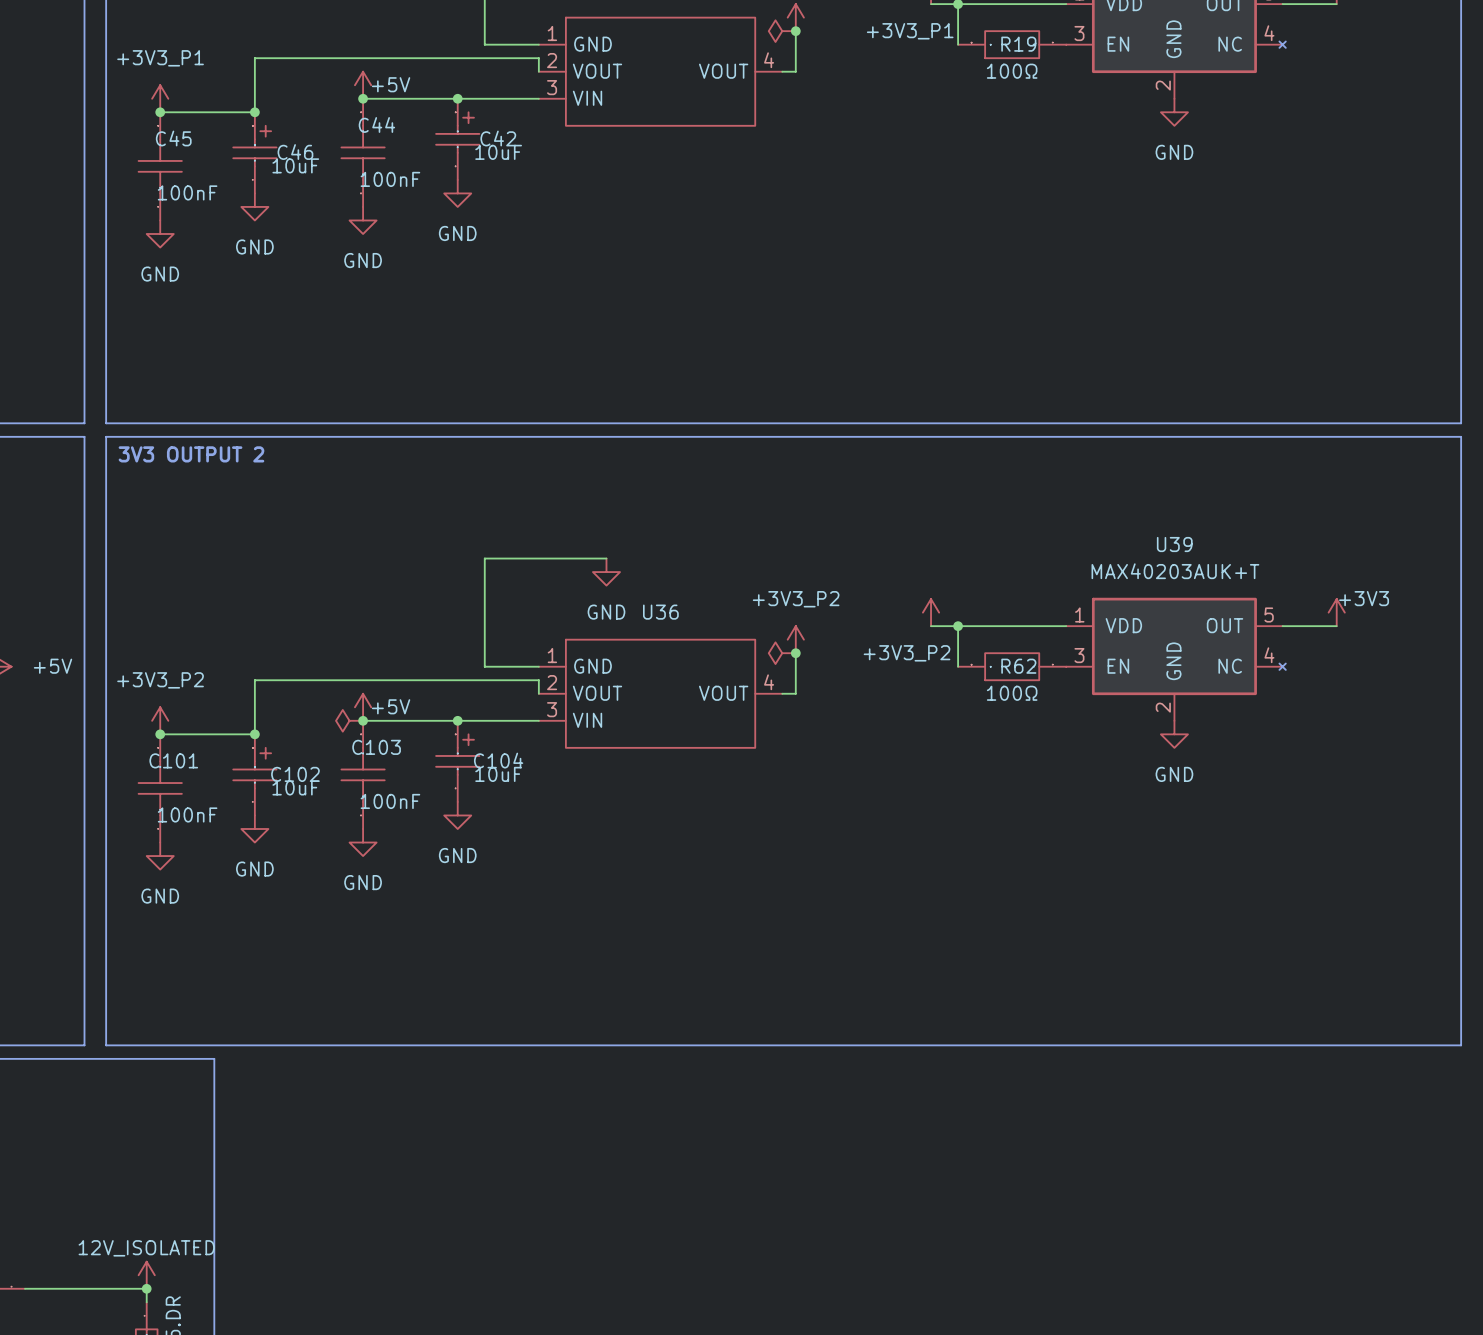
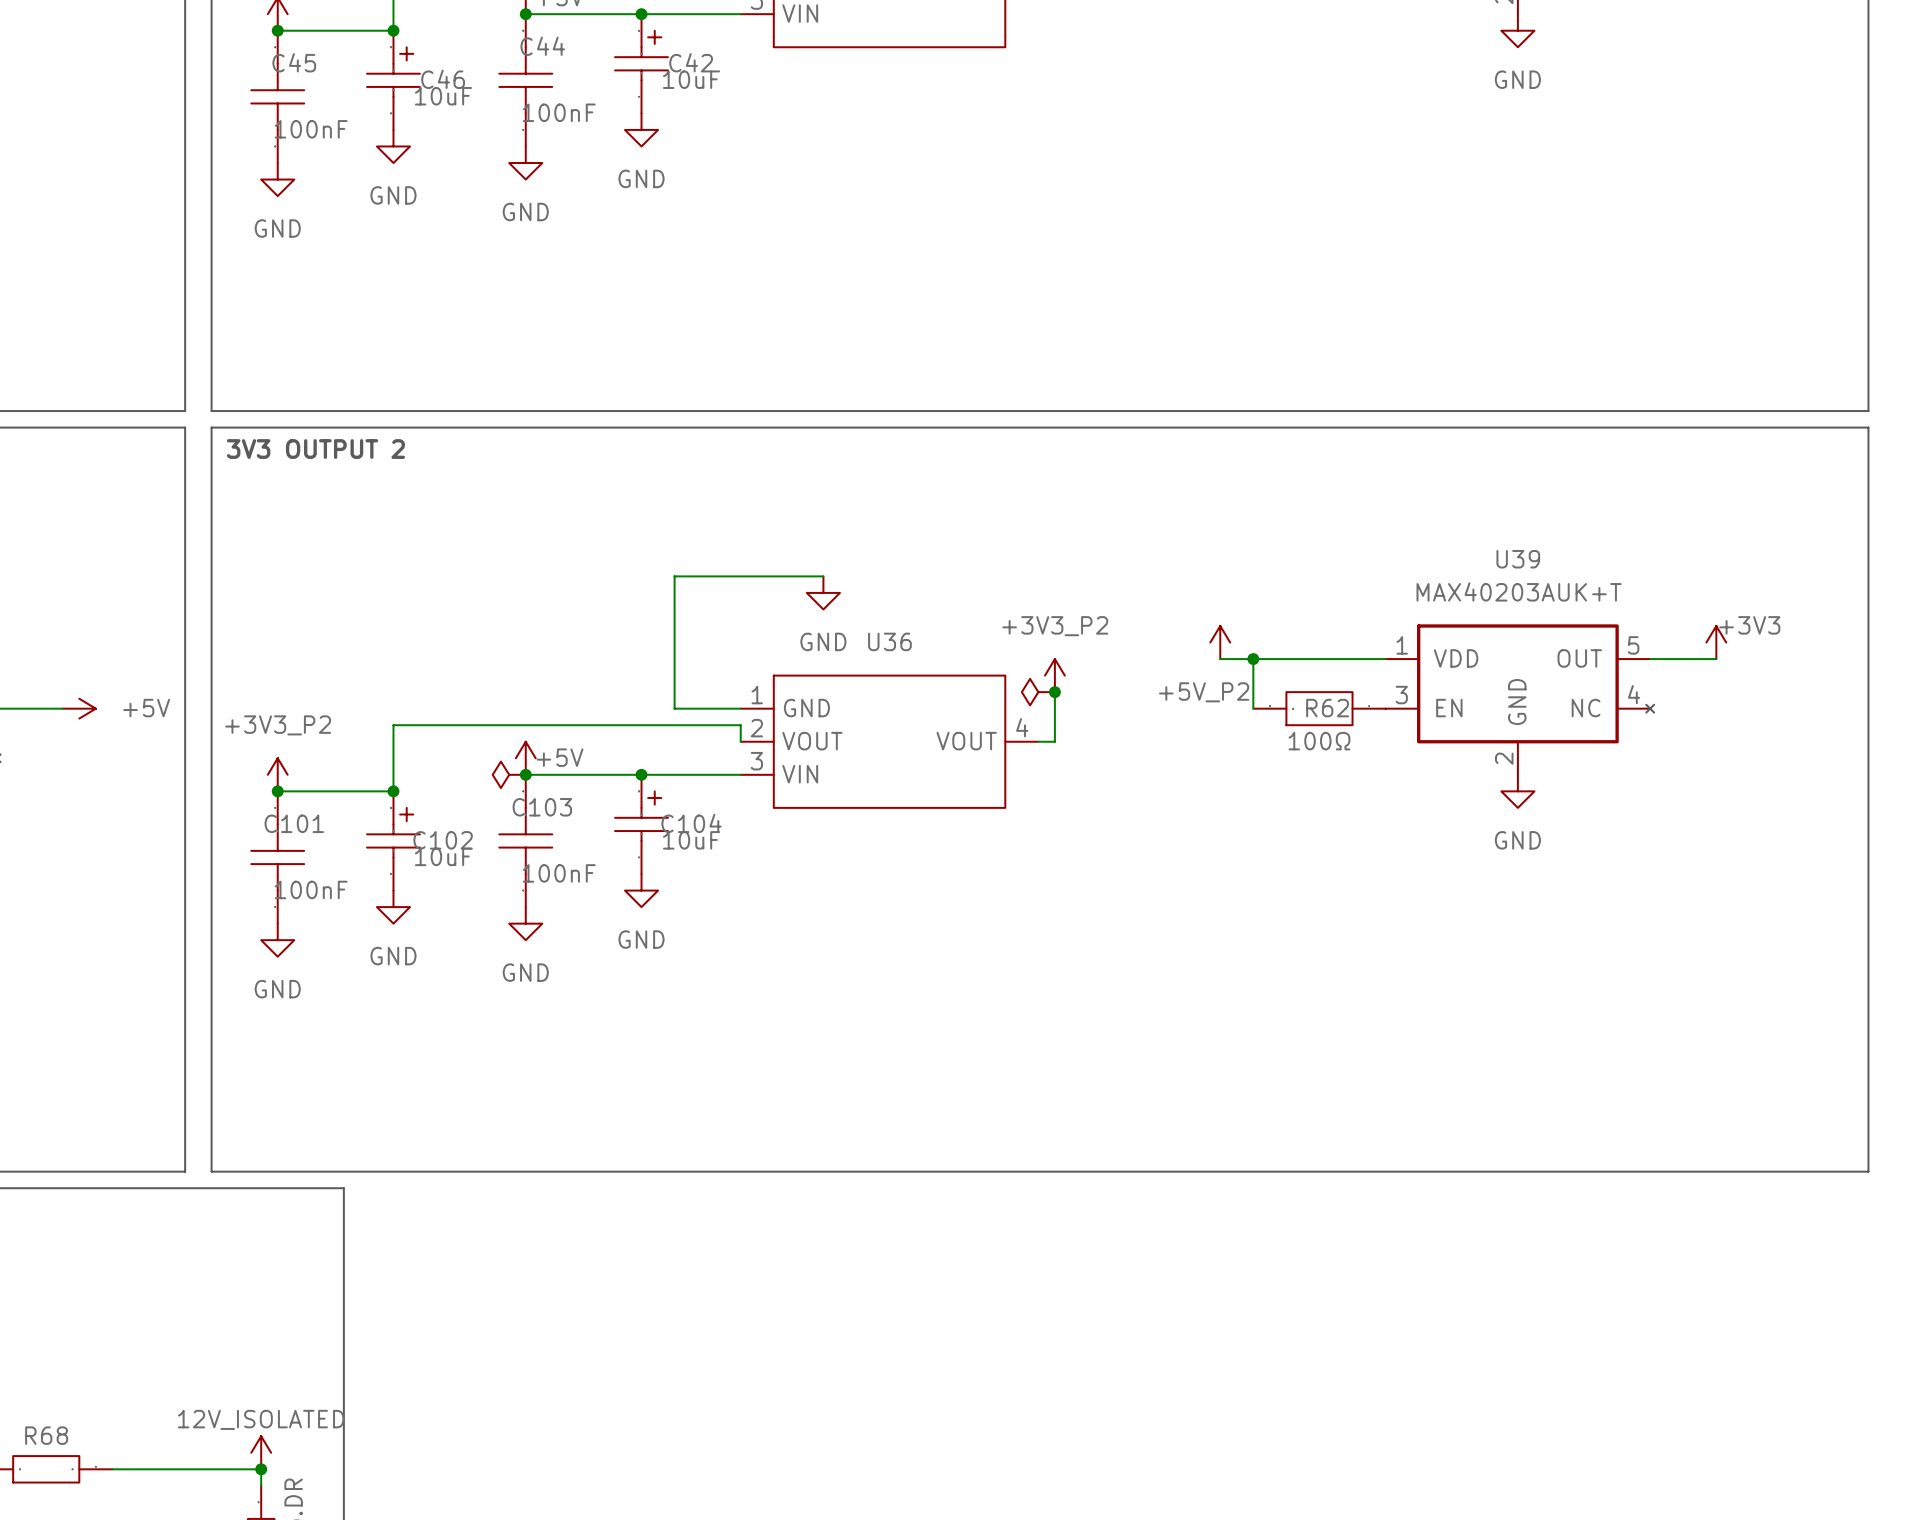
power symbol: +3V3_P2 (931, 612) -> +5V_P2 (1220, 642)

